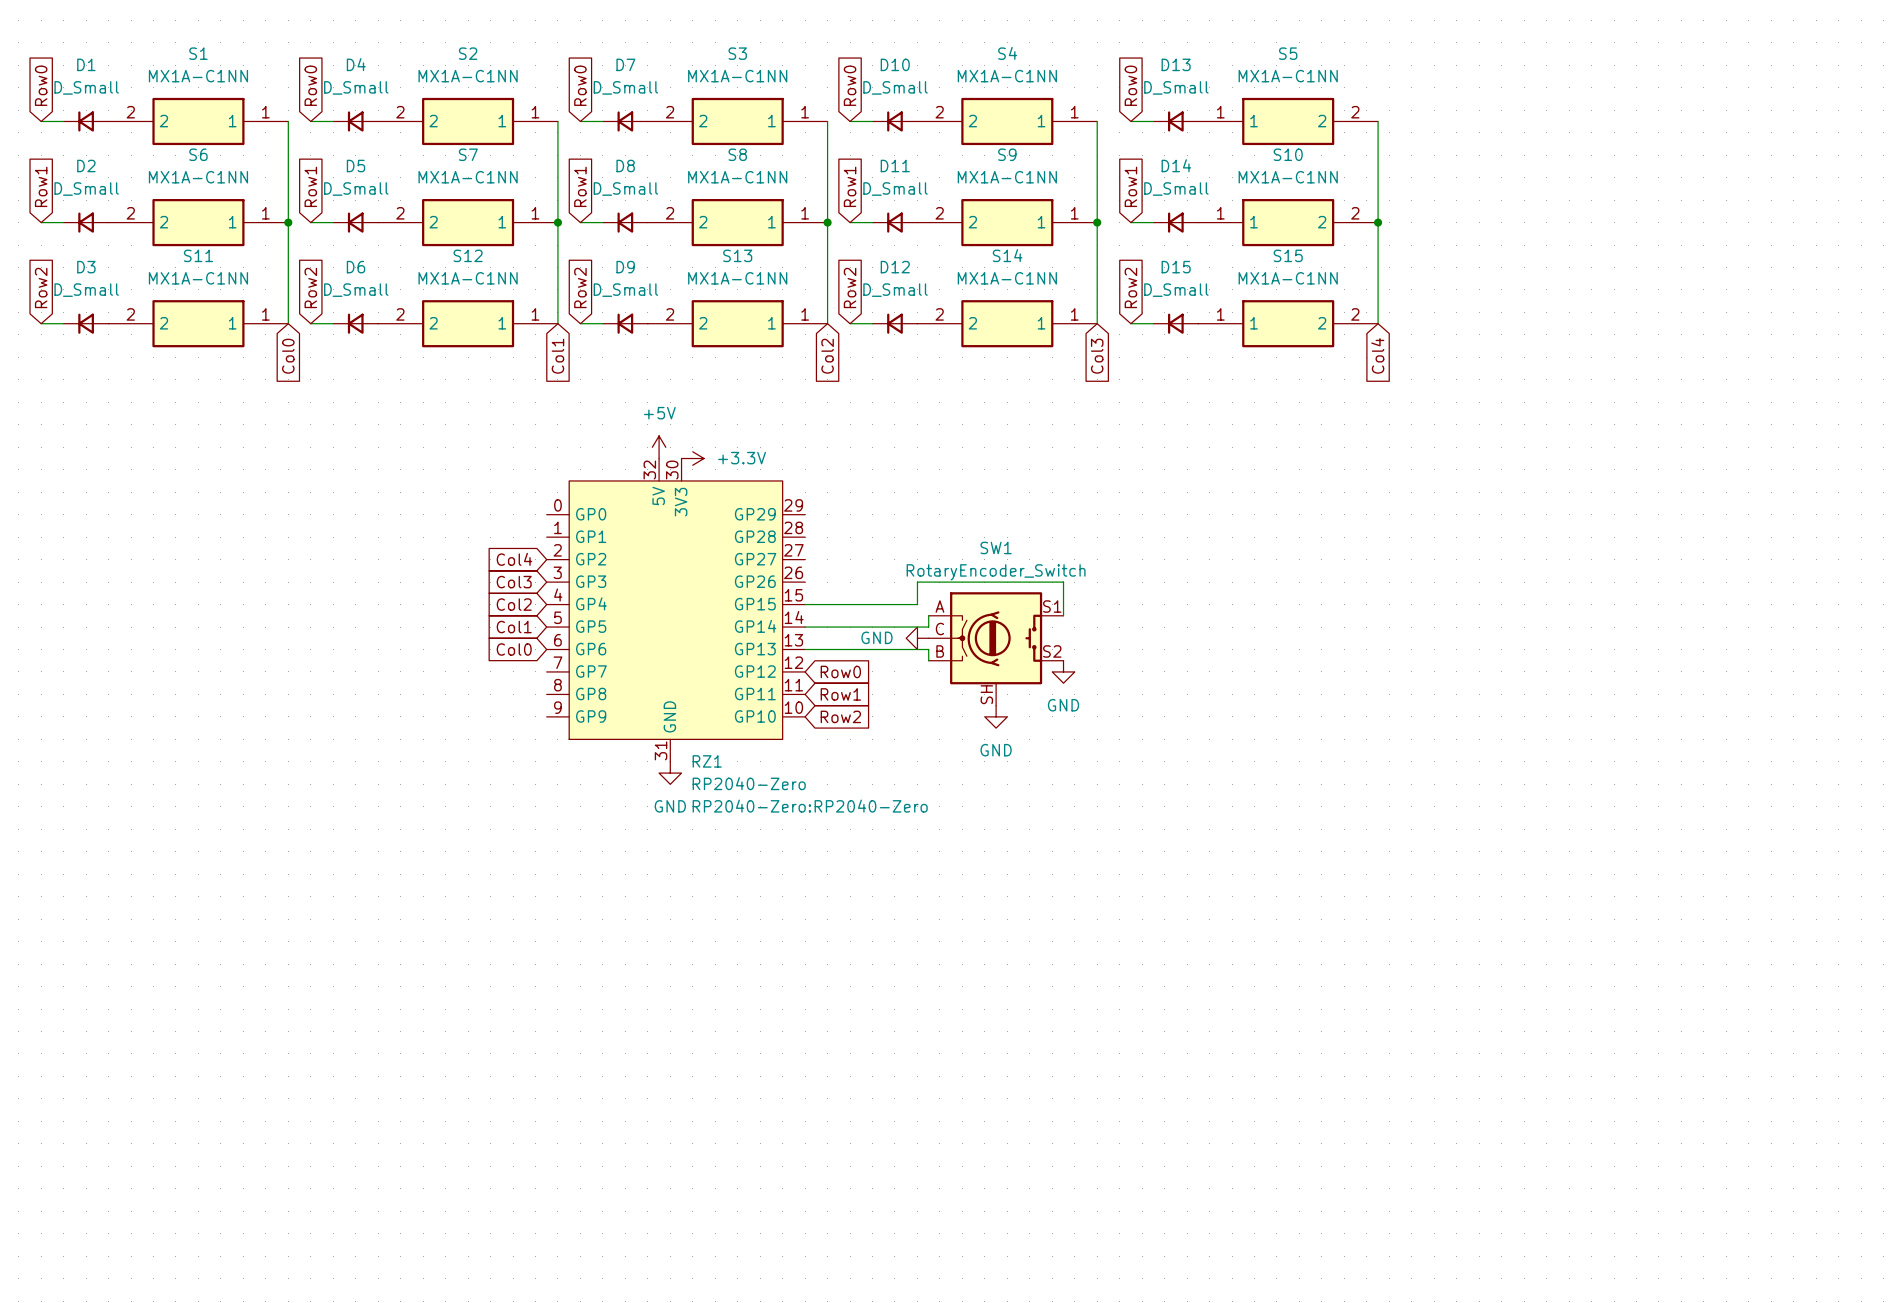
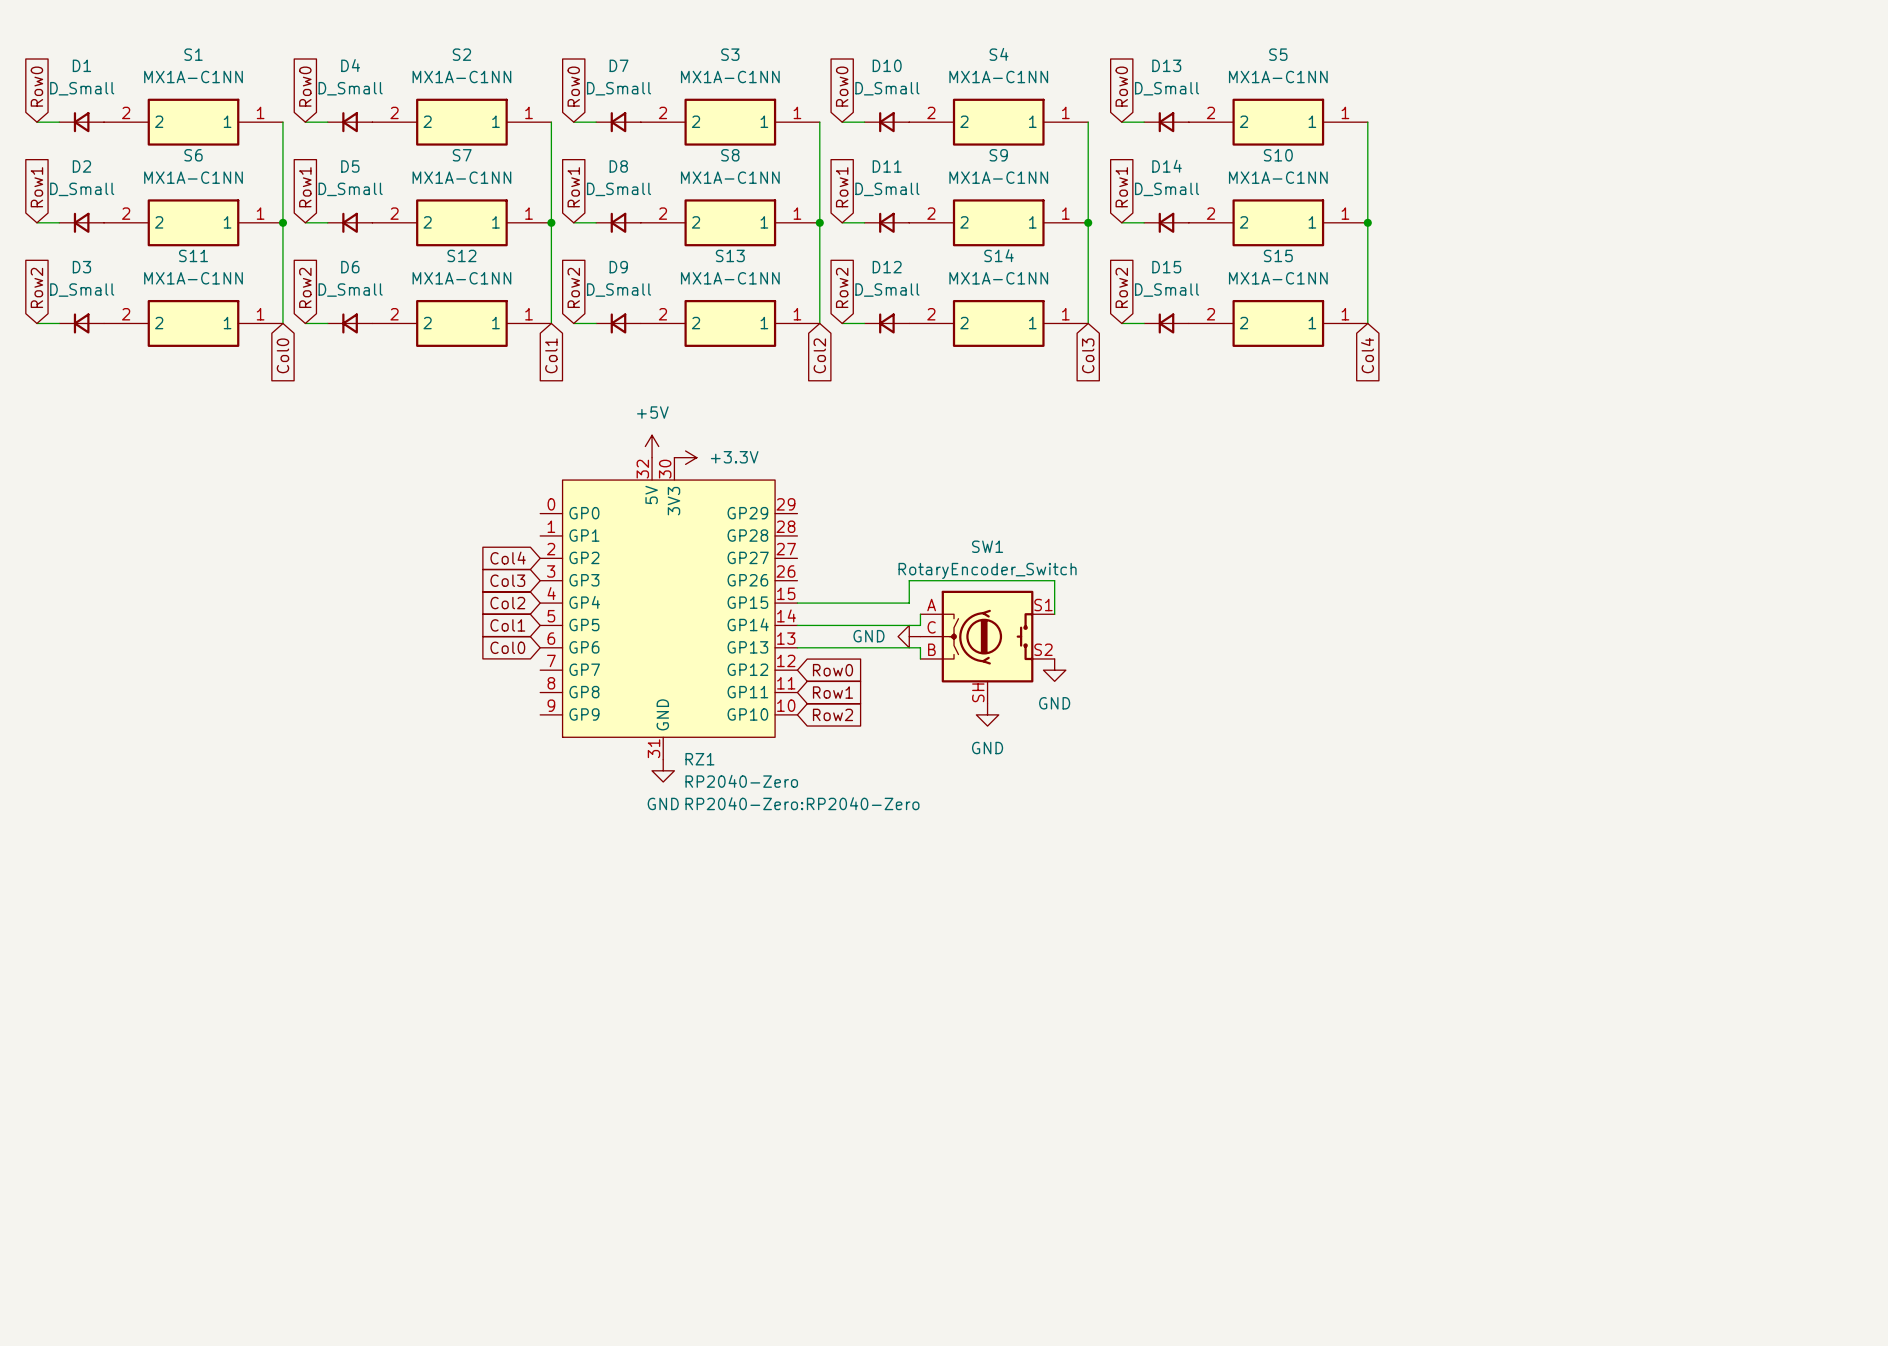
S5 rotation: 0° (1288, 121) -> 180° (1278, 122)
S10 rotation: 0° (1288, 222) -> 180° (1278, 222)
S15 rotation: 0° (1288, 323) -> 180° (1278, 323)

